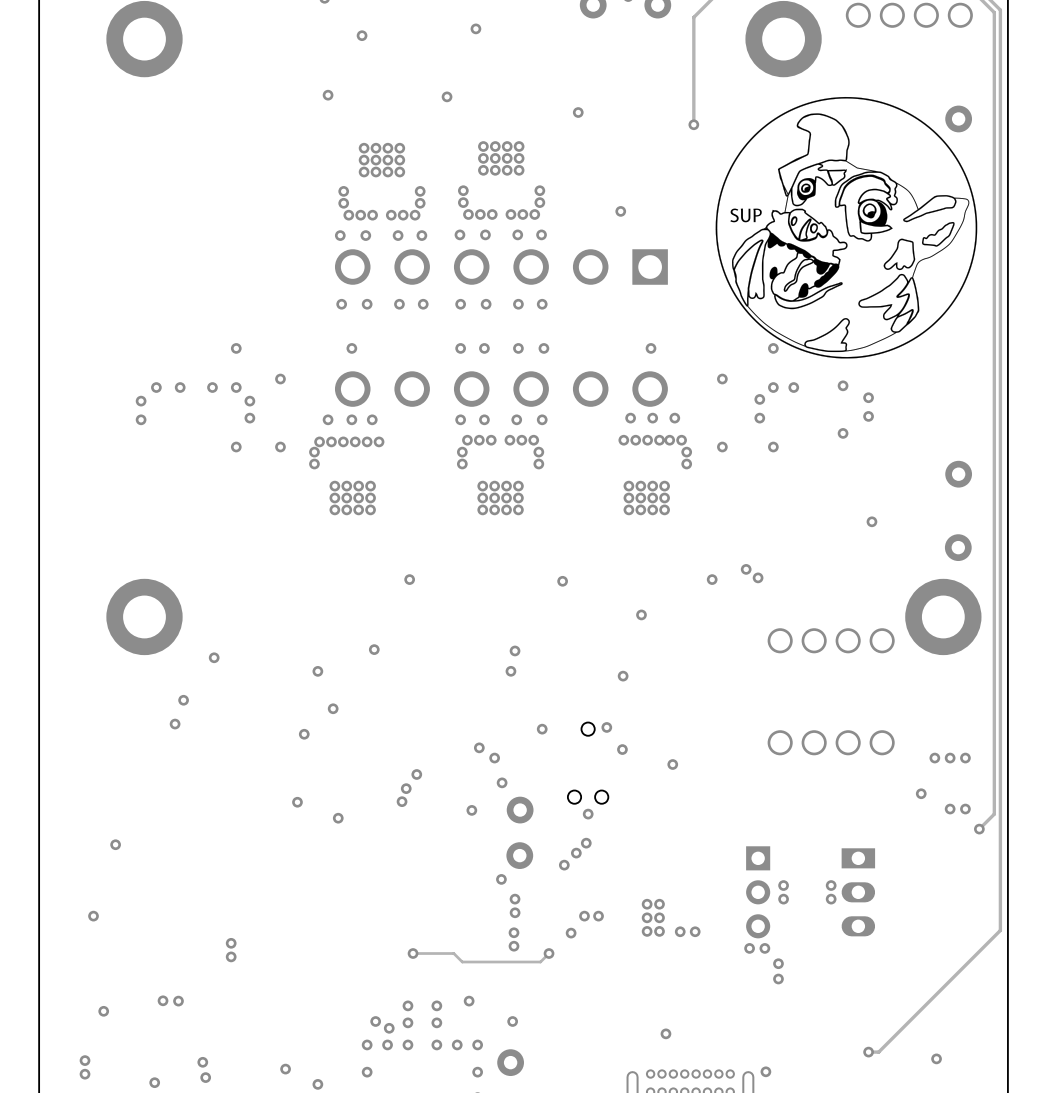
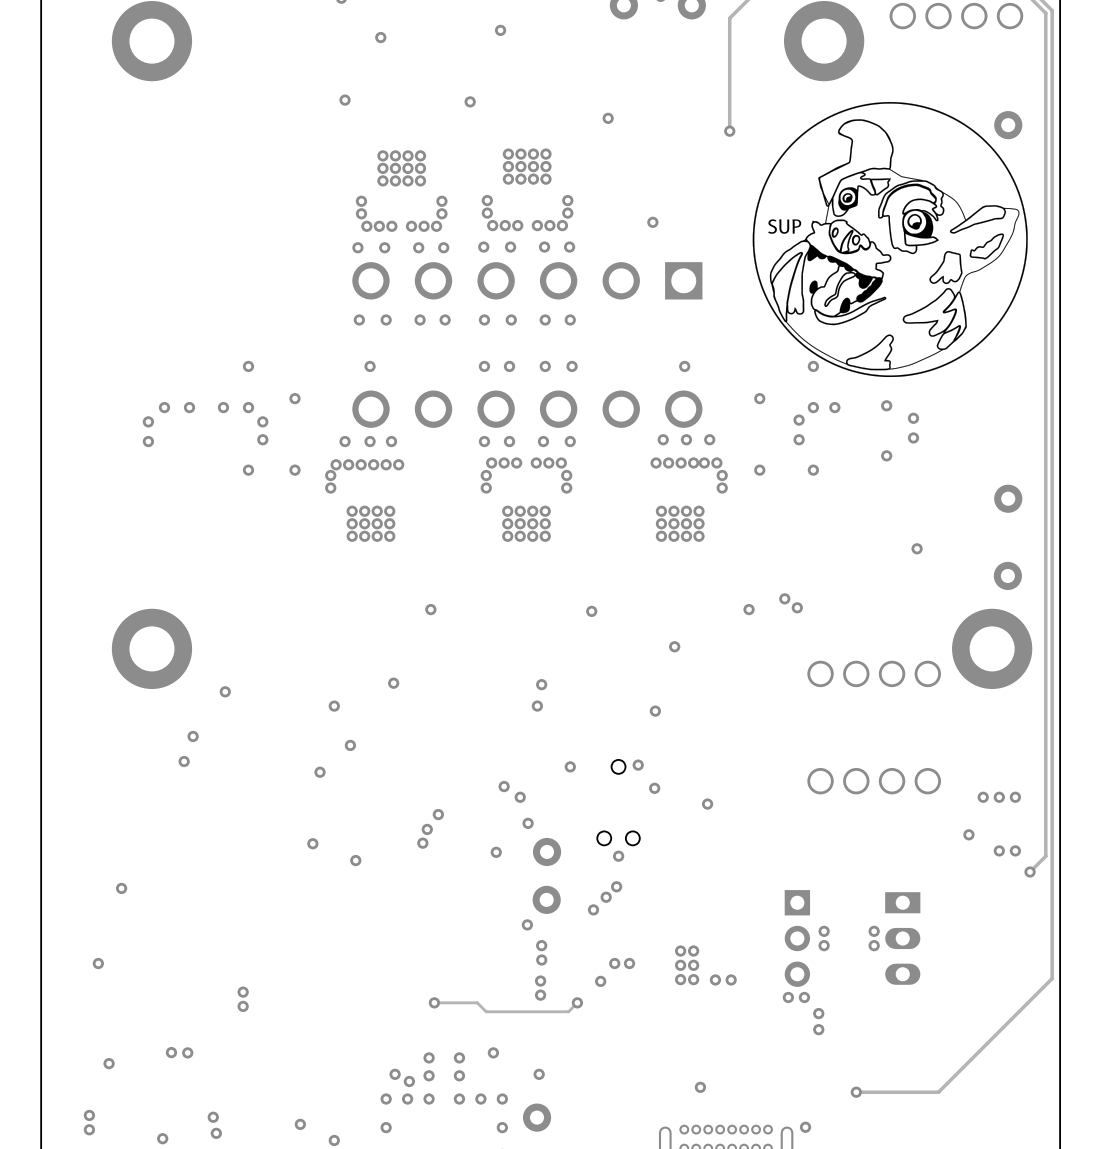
track: (892, 1038) (878, 1052) (868, 1052) -> (938, 1092) (856, 1092)
via position: (868, 1052) -> (856, 1092)
via: (936, 1058) -> none

